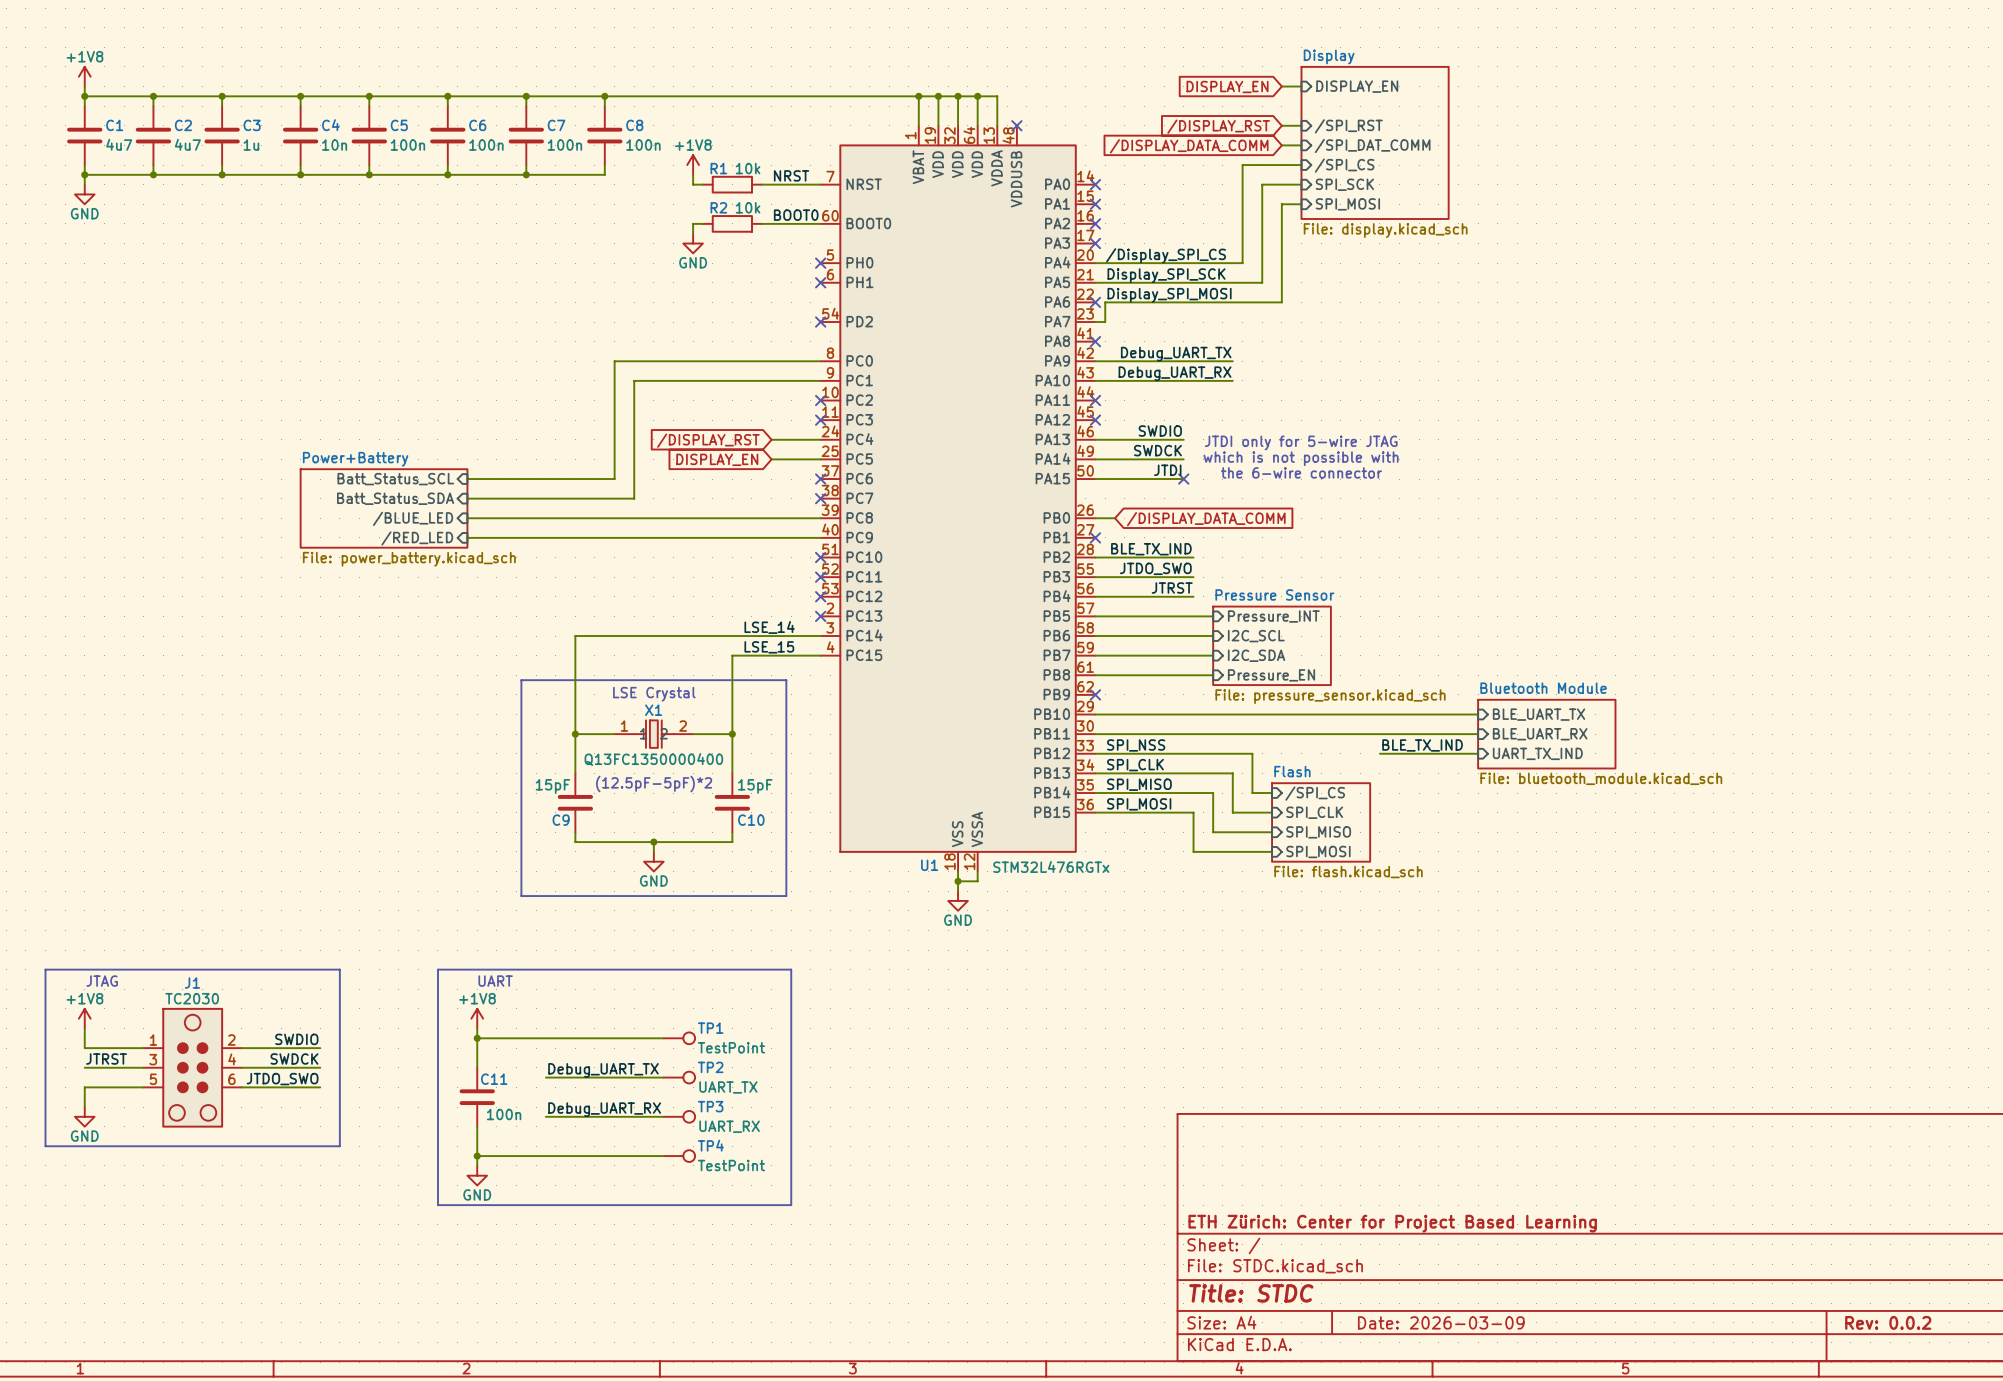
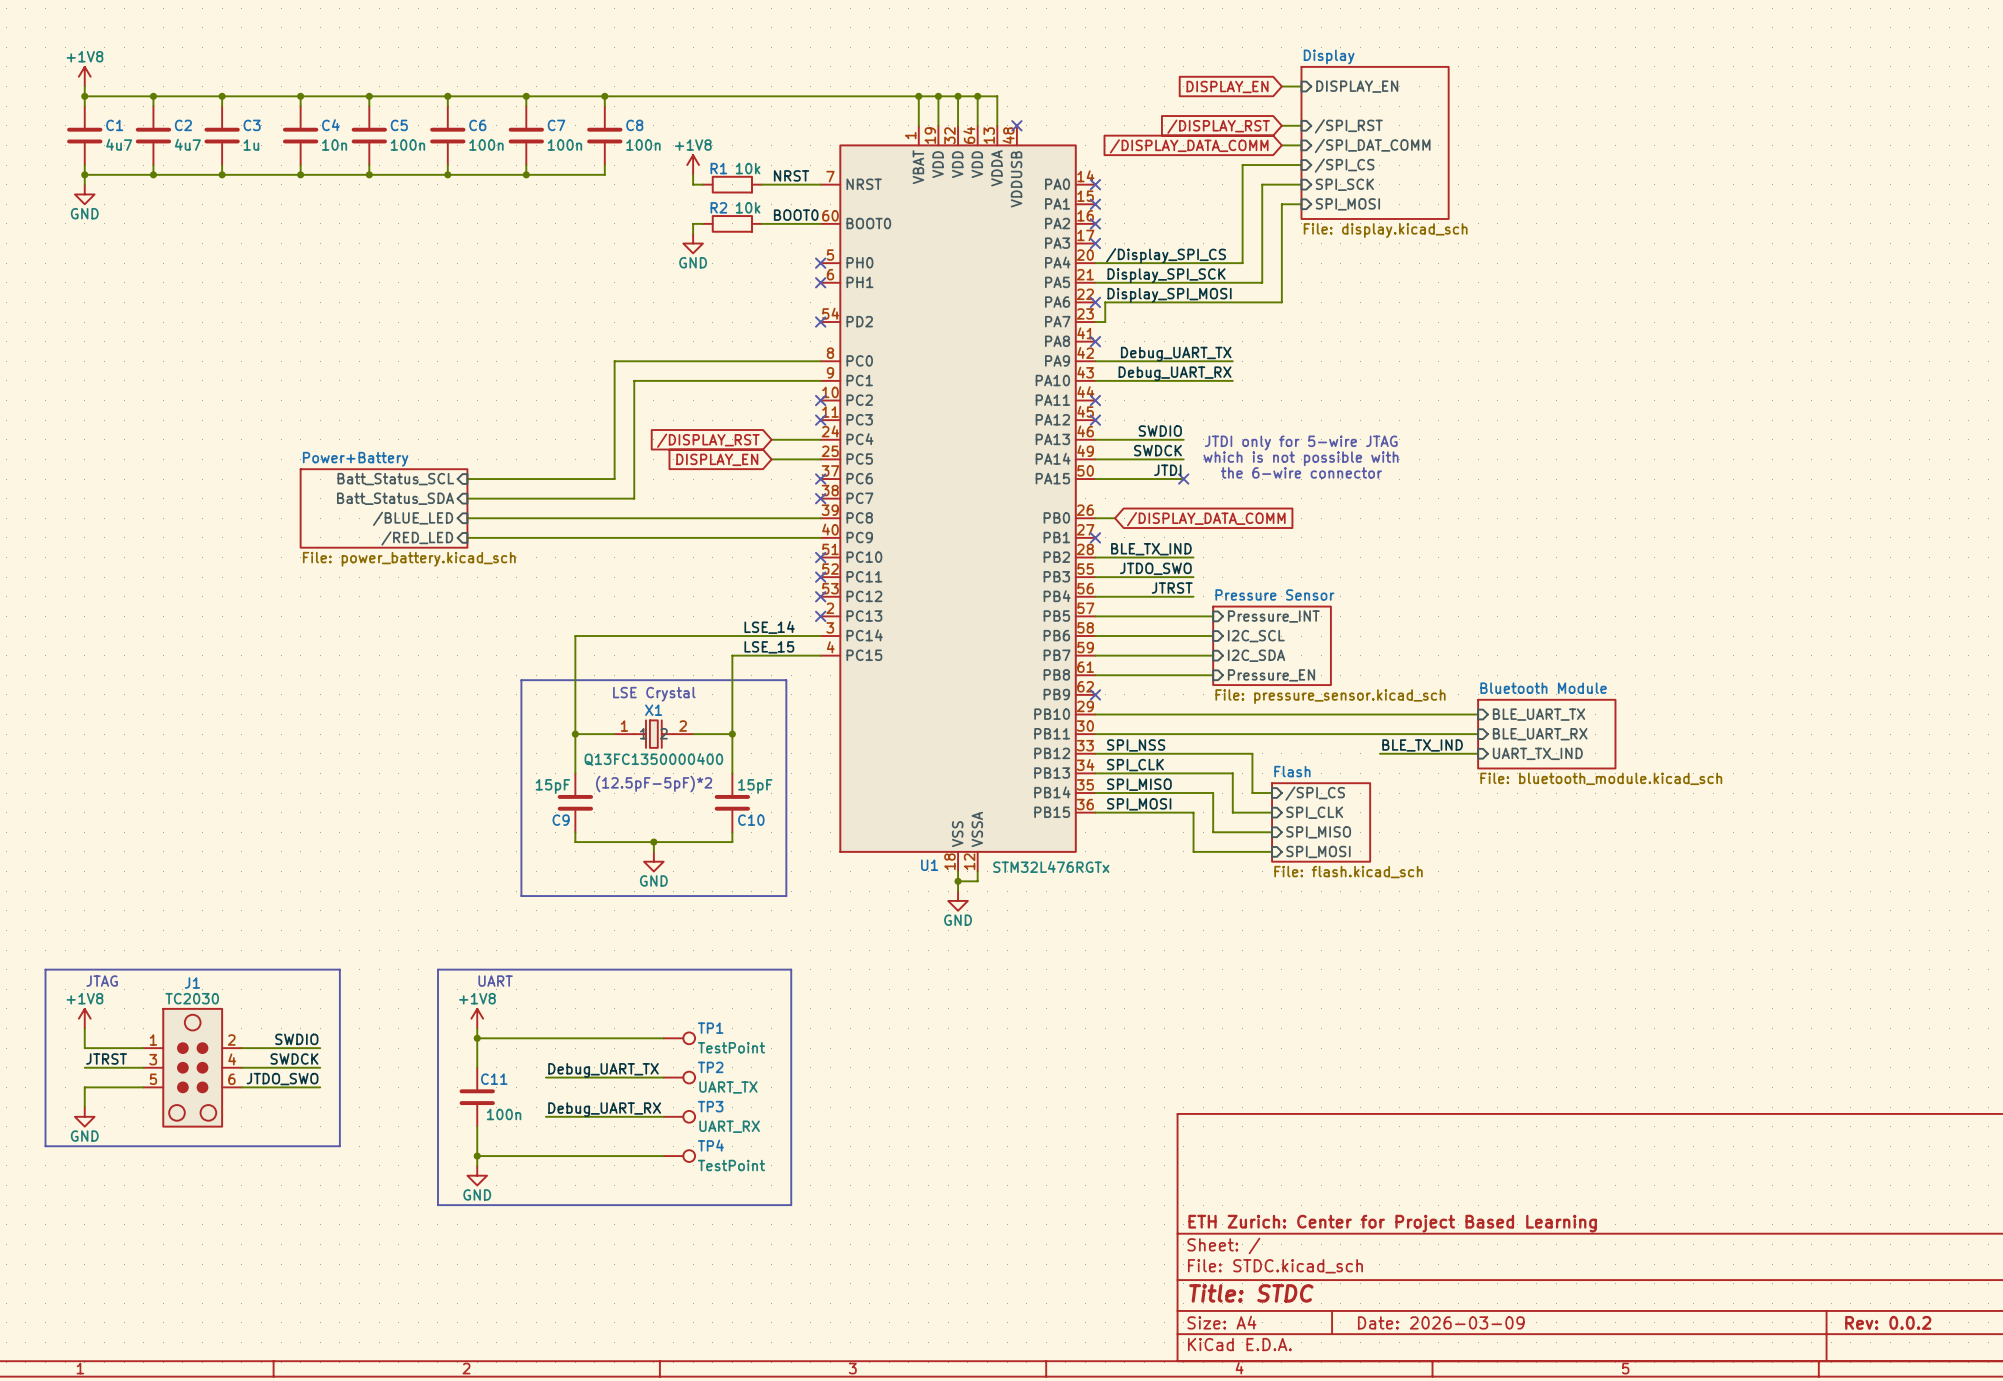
title block: ETH Zürich: Center for Project Based Learning (1392, 1223) -> ETH Zurich: Center for Project Based Learning (1392, 1223)

